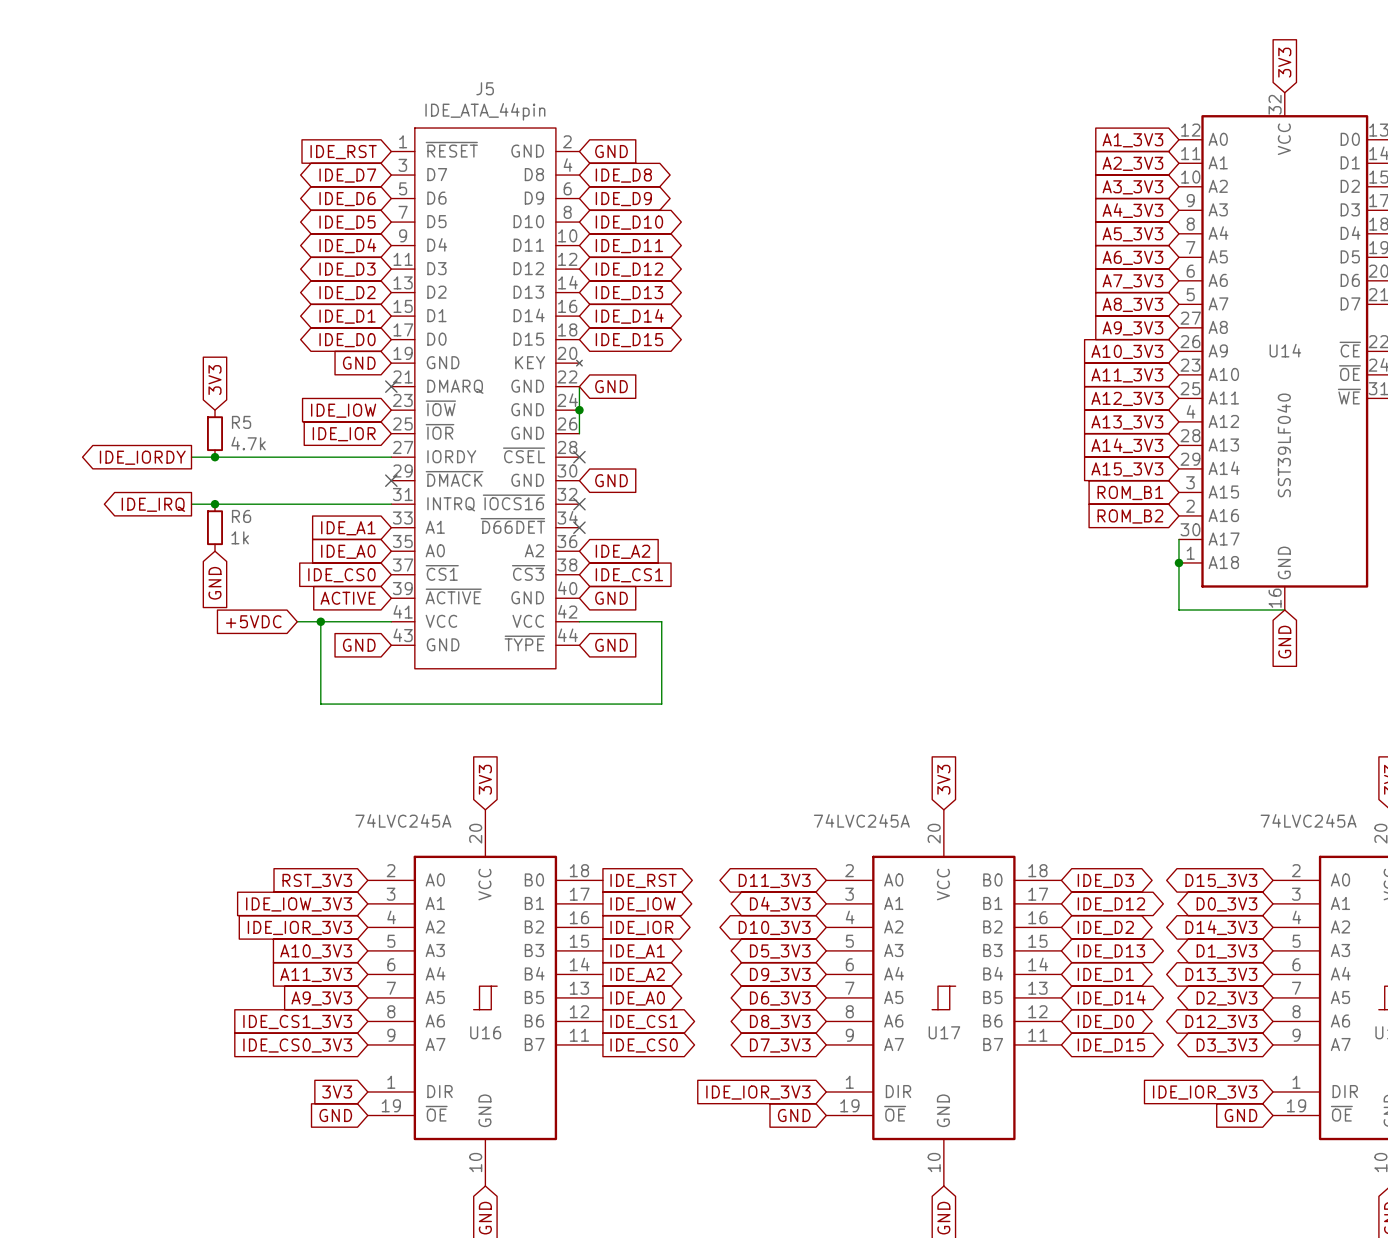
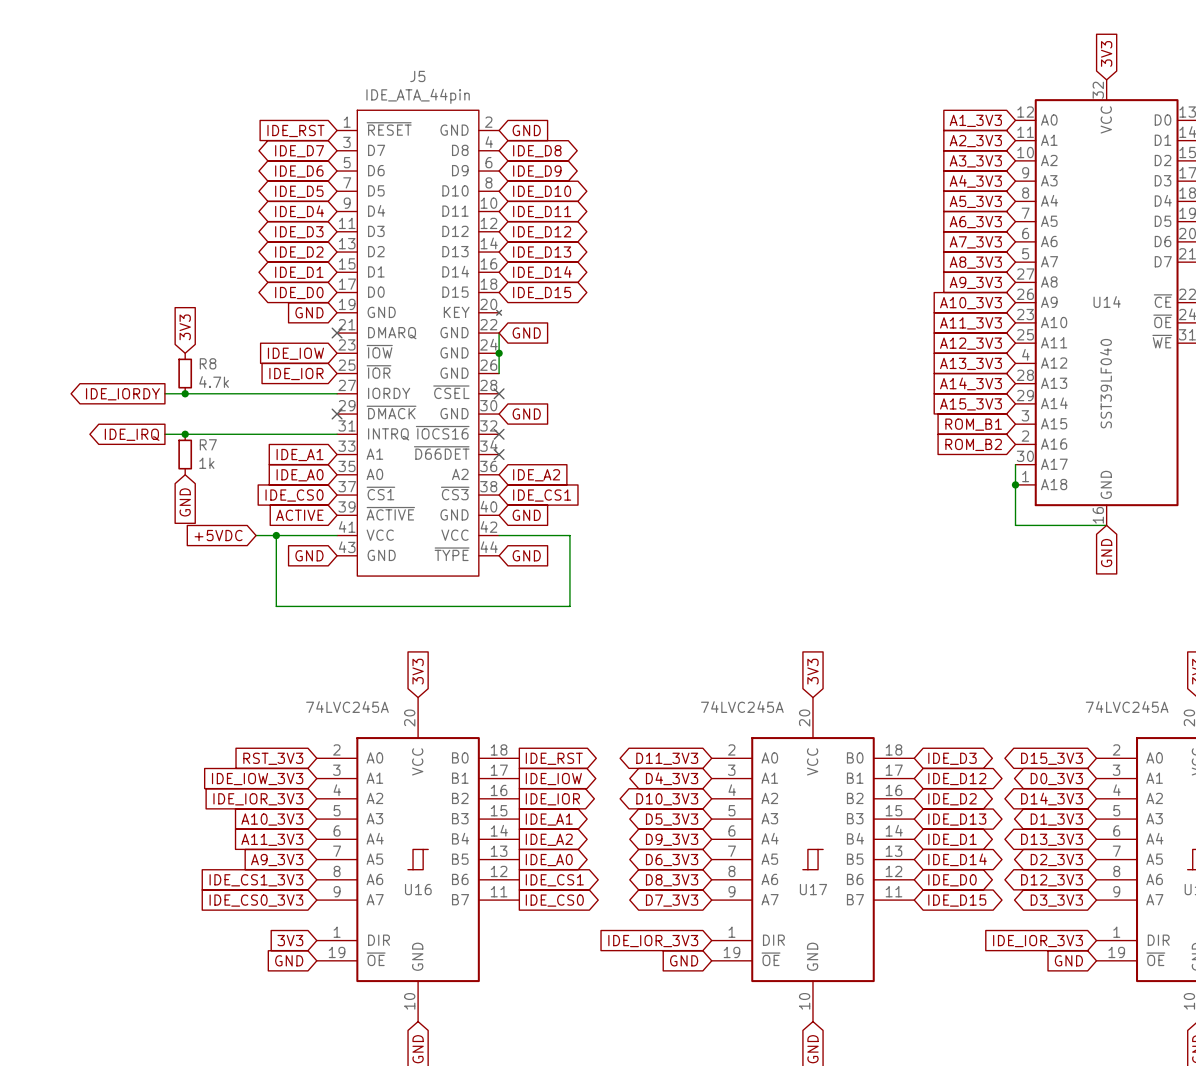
R5 name: R5 (241, 422) -> R8 (208, 363)
R6 name: R6 (241, 516) -> R7 (208, 444)

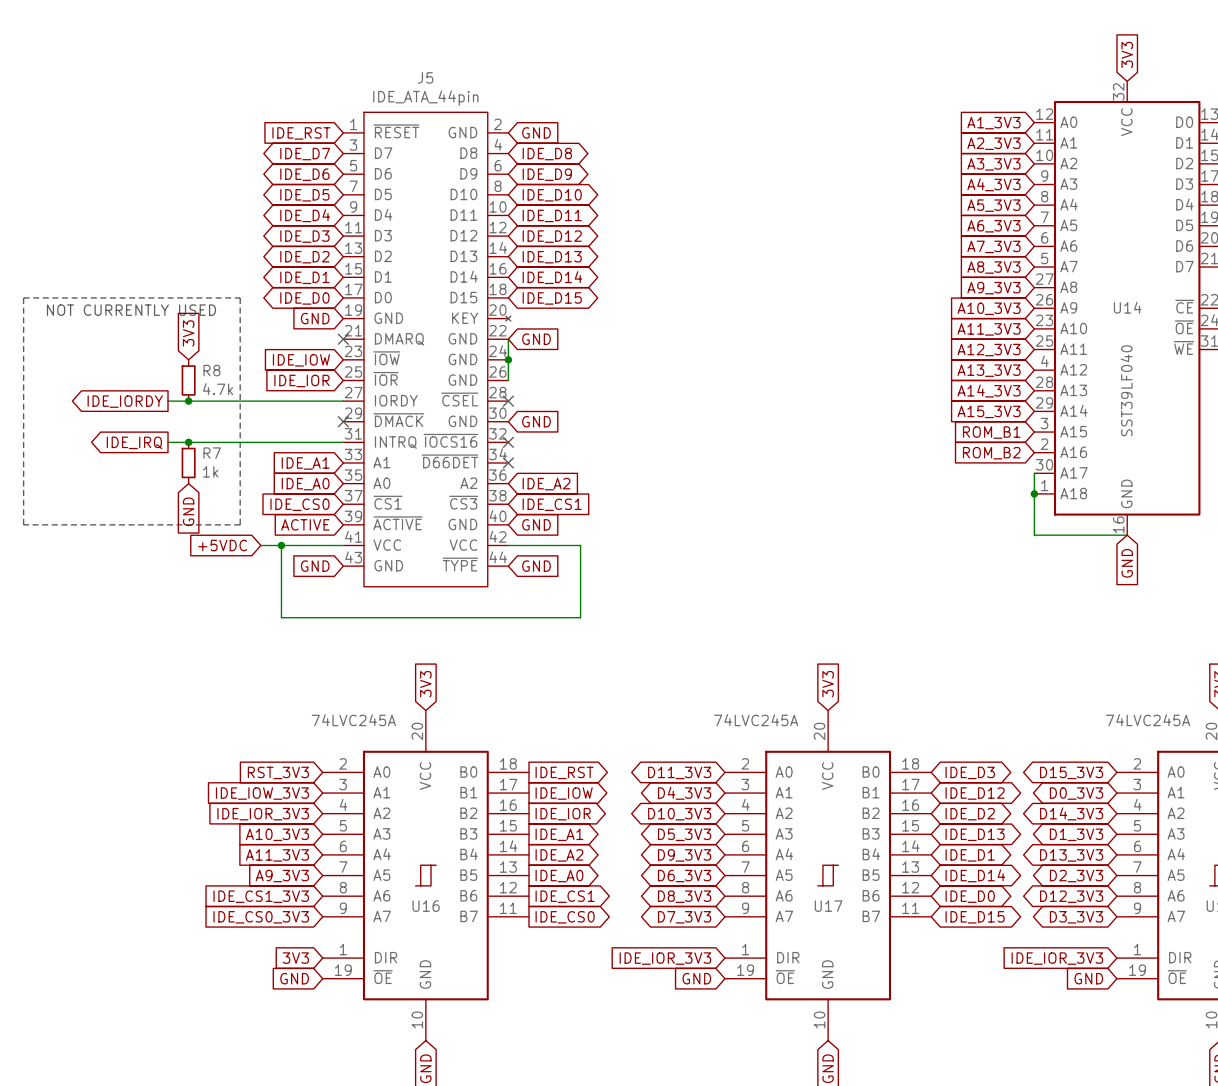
line: none -> (23, 297) (240, 297) (240, 524) (23, 524) (23, 297)
text: none -> NOT CURRENTLY USED (131, 310)

